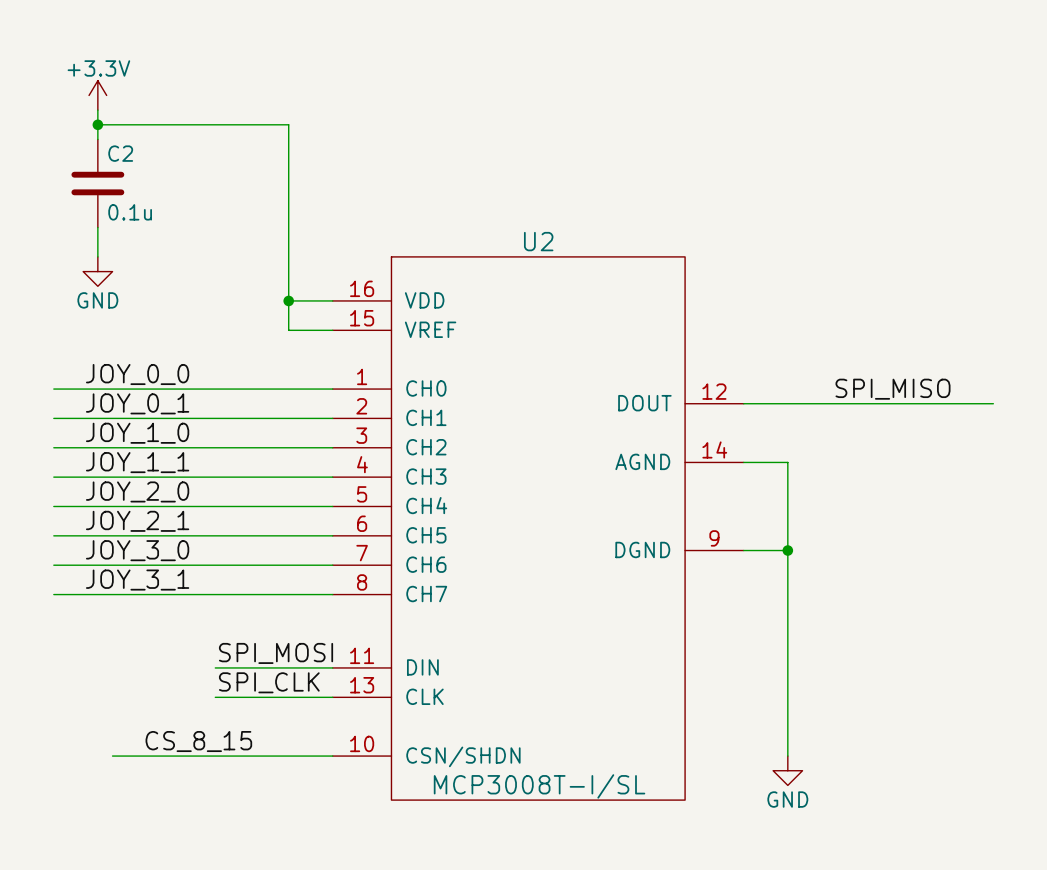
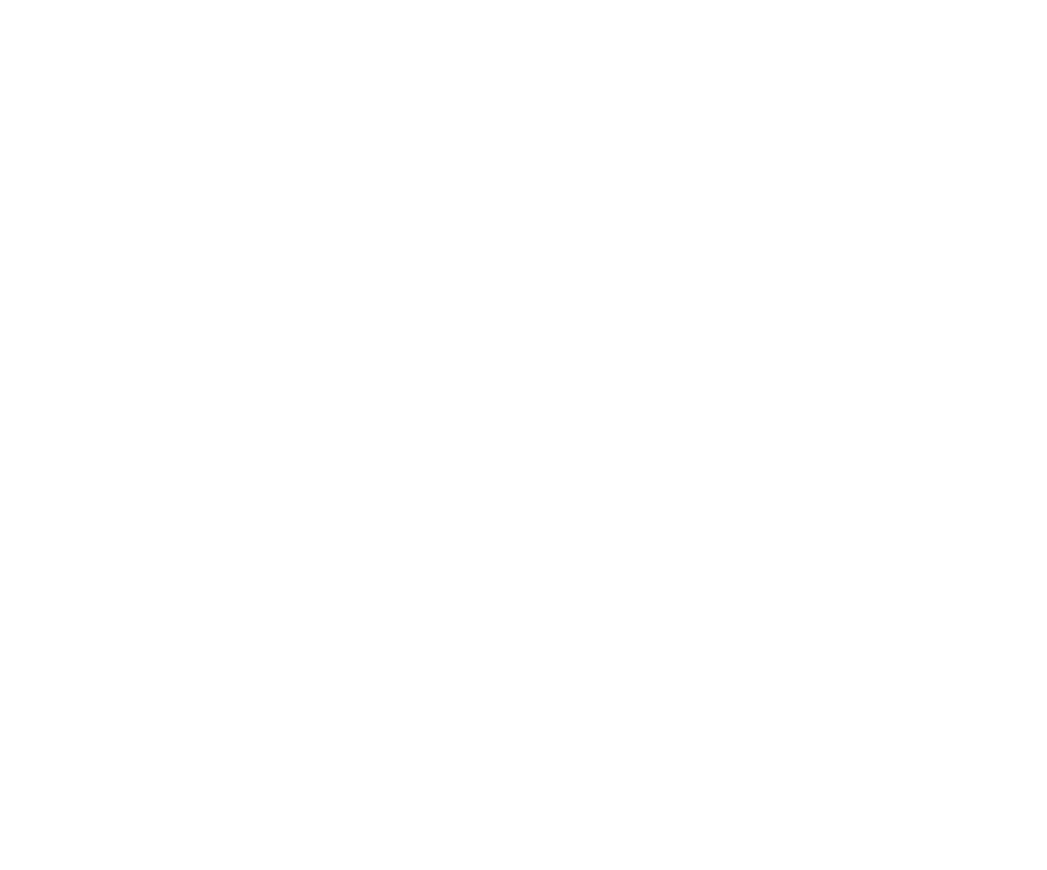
power symbol: +3.3V (97, 95) -> none
wire: (97, 110) (97, 139) -> none
wire: (97, 124) (288, 124) (288, 330) (332, 330) -> none
junction: (97, 124) -> none
C2: 0.1u (97, 183) -> none
wire: (97, 227) (97, 256) -> none
power symbol: GND (97, 271) -> none
wire: (288, 300) (332, 300) -> none
junction: (288, 300) -> none
label: JOY_0_0 (137, 374) -> none
wire: (53, 389) (332, 389) -> none
label: SPI_MISO (893, 389) -> none
label: JOY_0_1 (137, 403) -> none
wire: (743, 403) (993, 403) -> none
wire: (53, 418) (332, 418) -> none
label: JOY_1_0 (137, 433) -> none
wire: (53, 447) (332, 447) -> none
label: JOY_1_1 (137, 462) -> none
wire: (743, 462) (787, 462) (787, 756) -> none
wire: (53, 477) (332, 477) -> none
label: JOY_2_0 (137, 491) -> none
wire: (53, 506) (332, 506) -> none
label: JOY_2_1 (137, 521) -> none
U2: MCP3008T-I/SL (538, 528) -> none
wire: (53, 535) (332, 535) -> none
label: JOY_3_0 (137, 550) -> none
wire: (743, 550) (787, 550) -> none
junction: (787, 550) -> none
wire: (53, 565) (332, 565) -> none
label: JOY_3_1 (137, 580) -> none
wire: (53, 594) (332, 594) -> none
label: SPI_MOSI (276, 653) -> none
wire: (215, 667) (332, 667) -> none
label: SPI_CLK (269, 682) -> none
wire: (215, 697) (332, 697) -> none
label: CS_8_15 (198, 741) -> none
wire: (112, 756) (332, 756) -> none
power symbol: GND (787, 770) -> none

